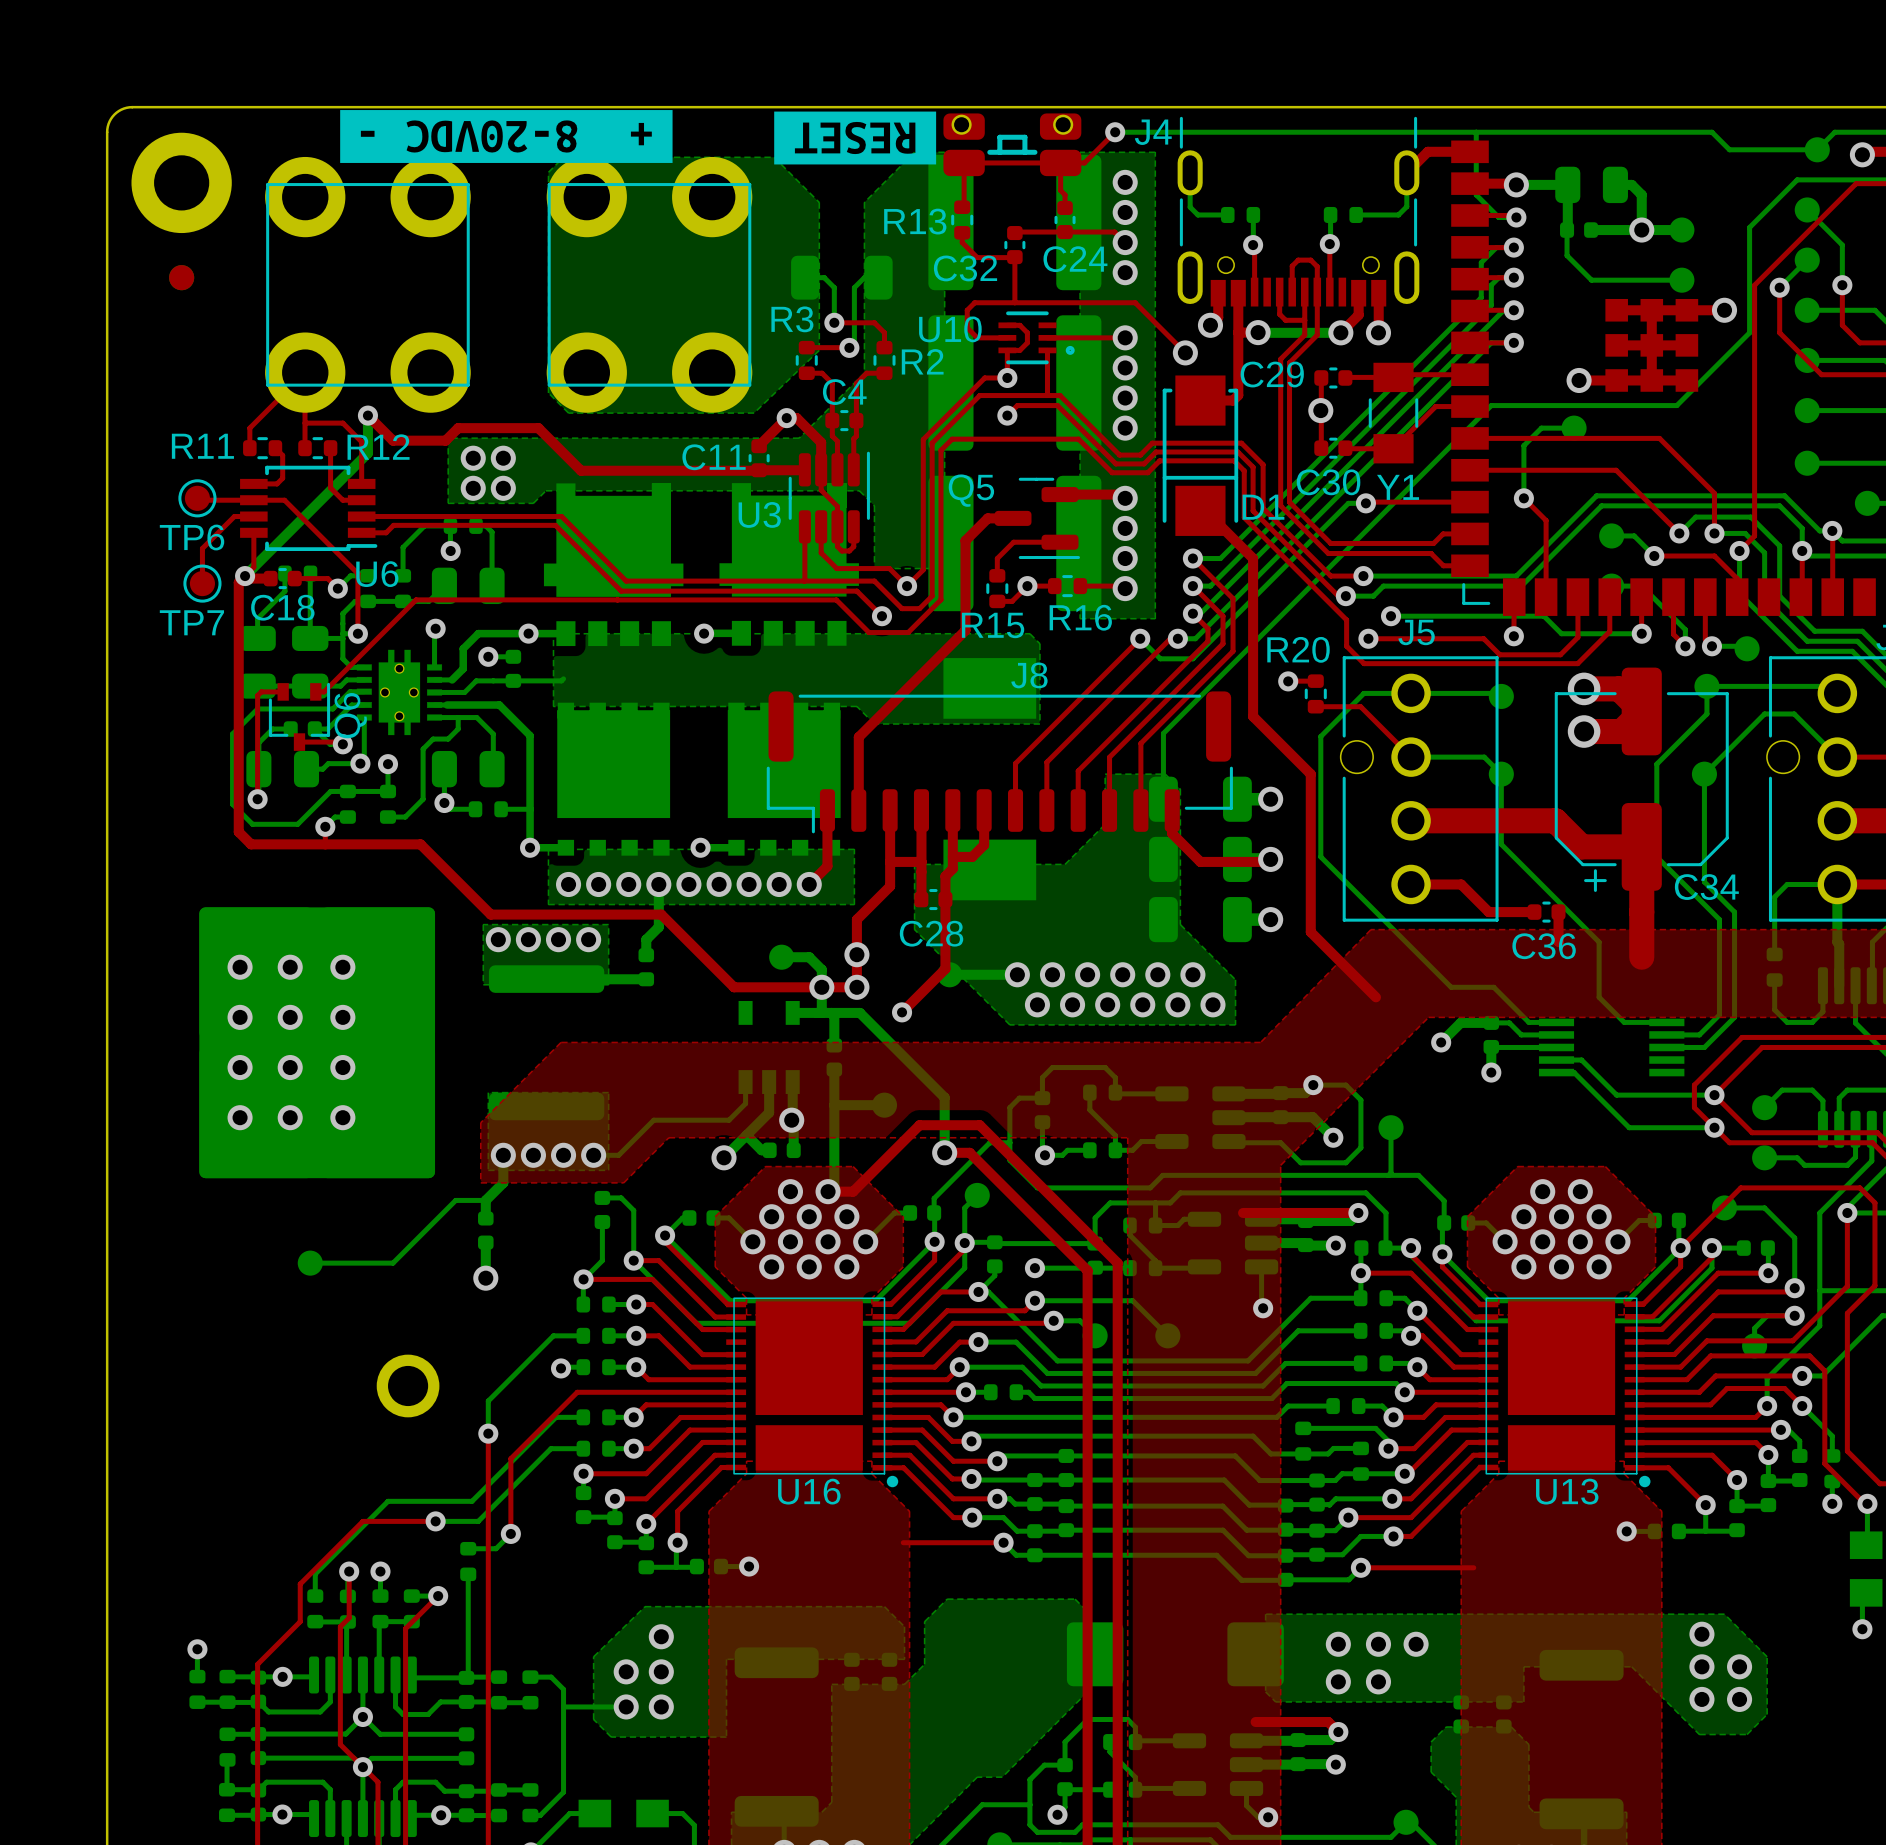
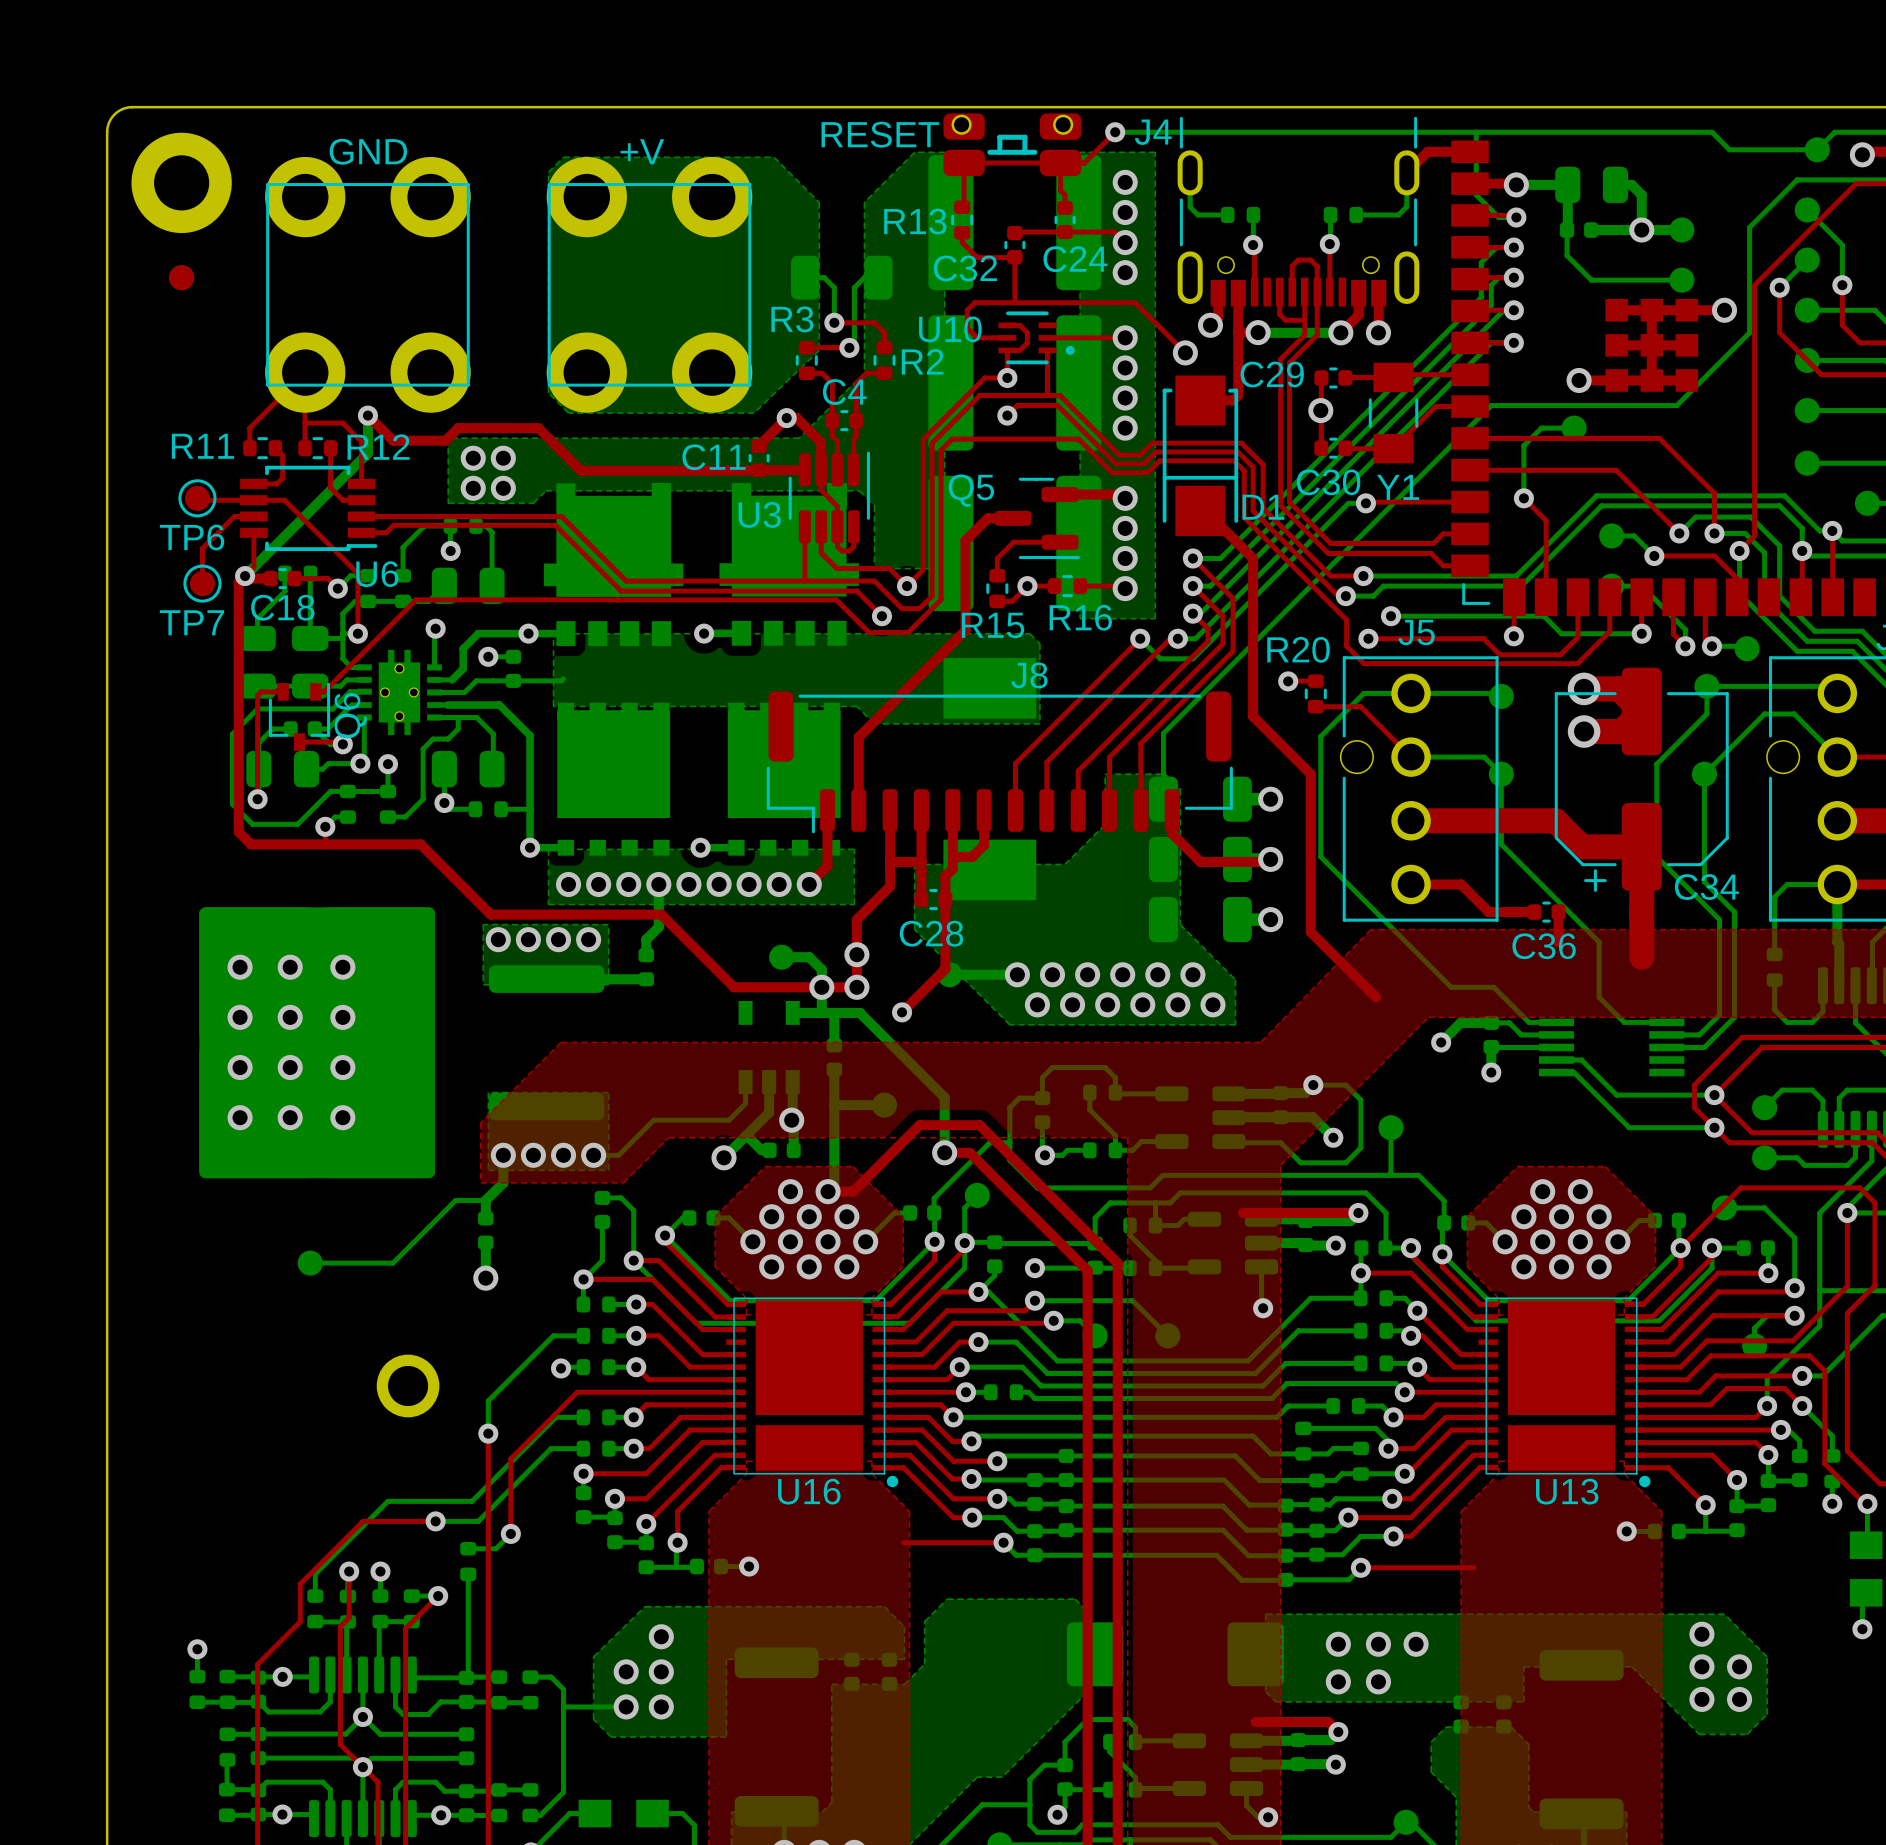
drawing: [340, 110, 673, 163] -> none
drawing: [774, 111, 937, 165] -> none
text: none -> RESET (880, 134)
text: none -> GND (368, 151)
text: none -> +V (642, 151)

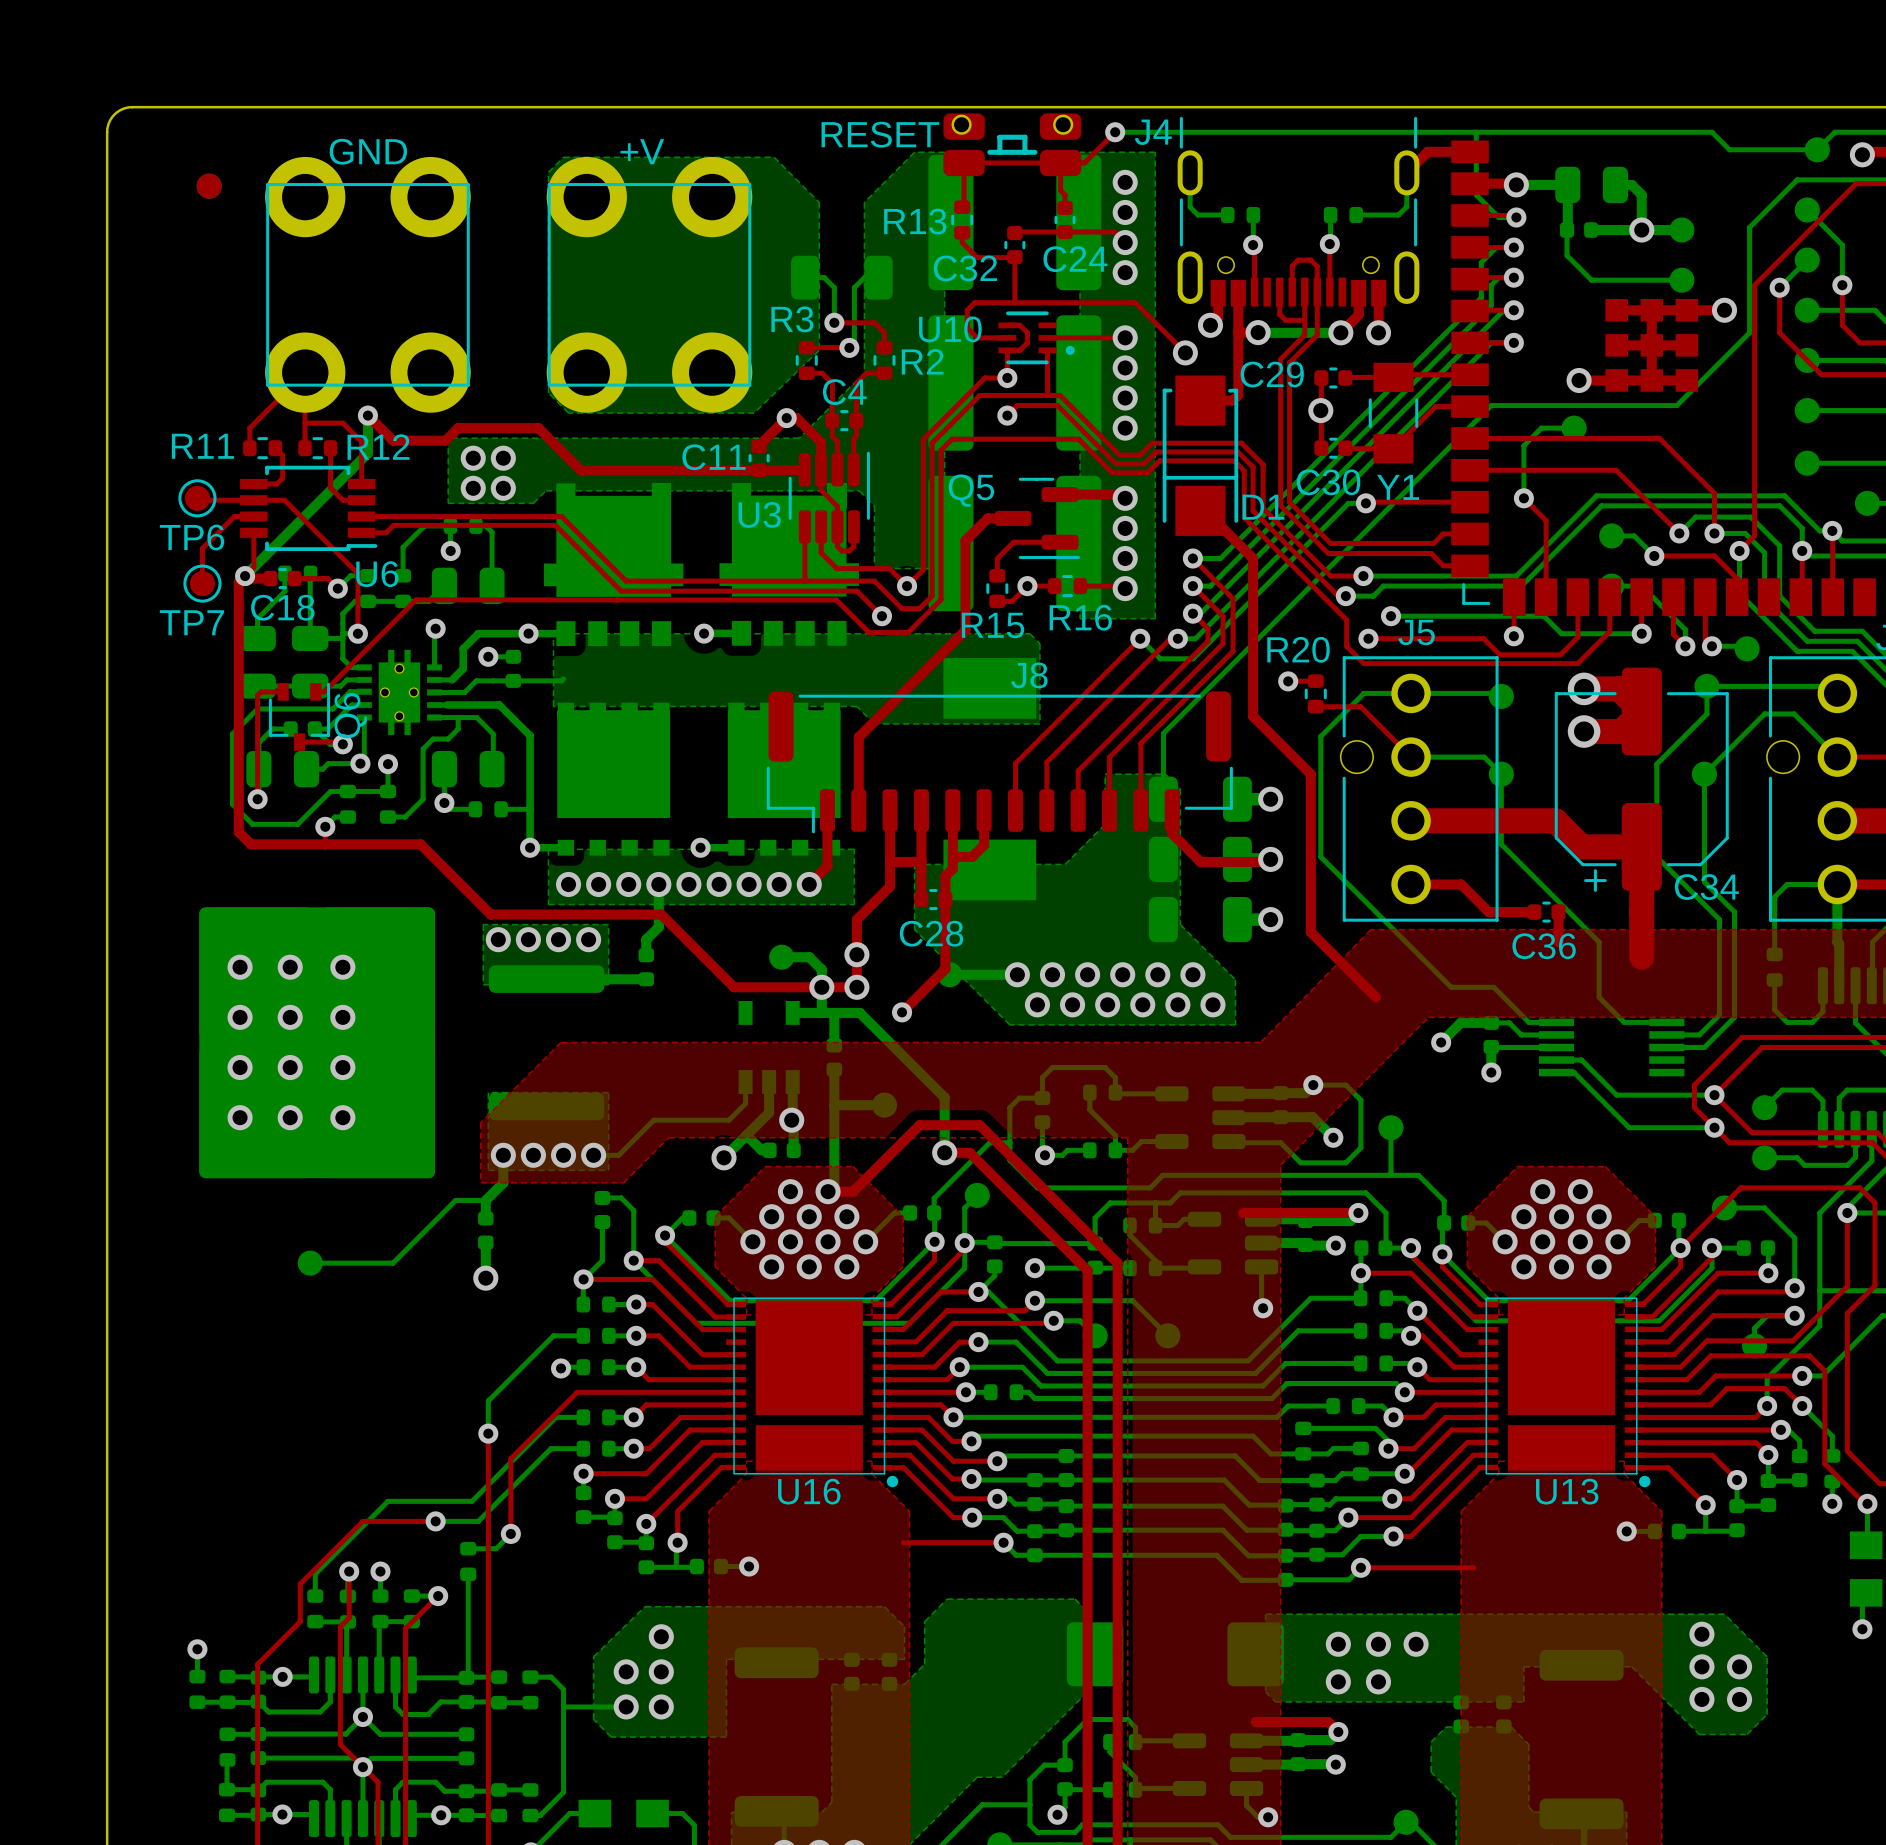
part: (181, 182) -> none
part position: (181, 277) -> (209, 186)
part: (408, 1385) -> none

